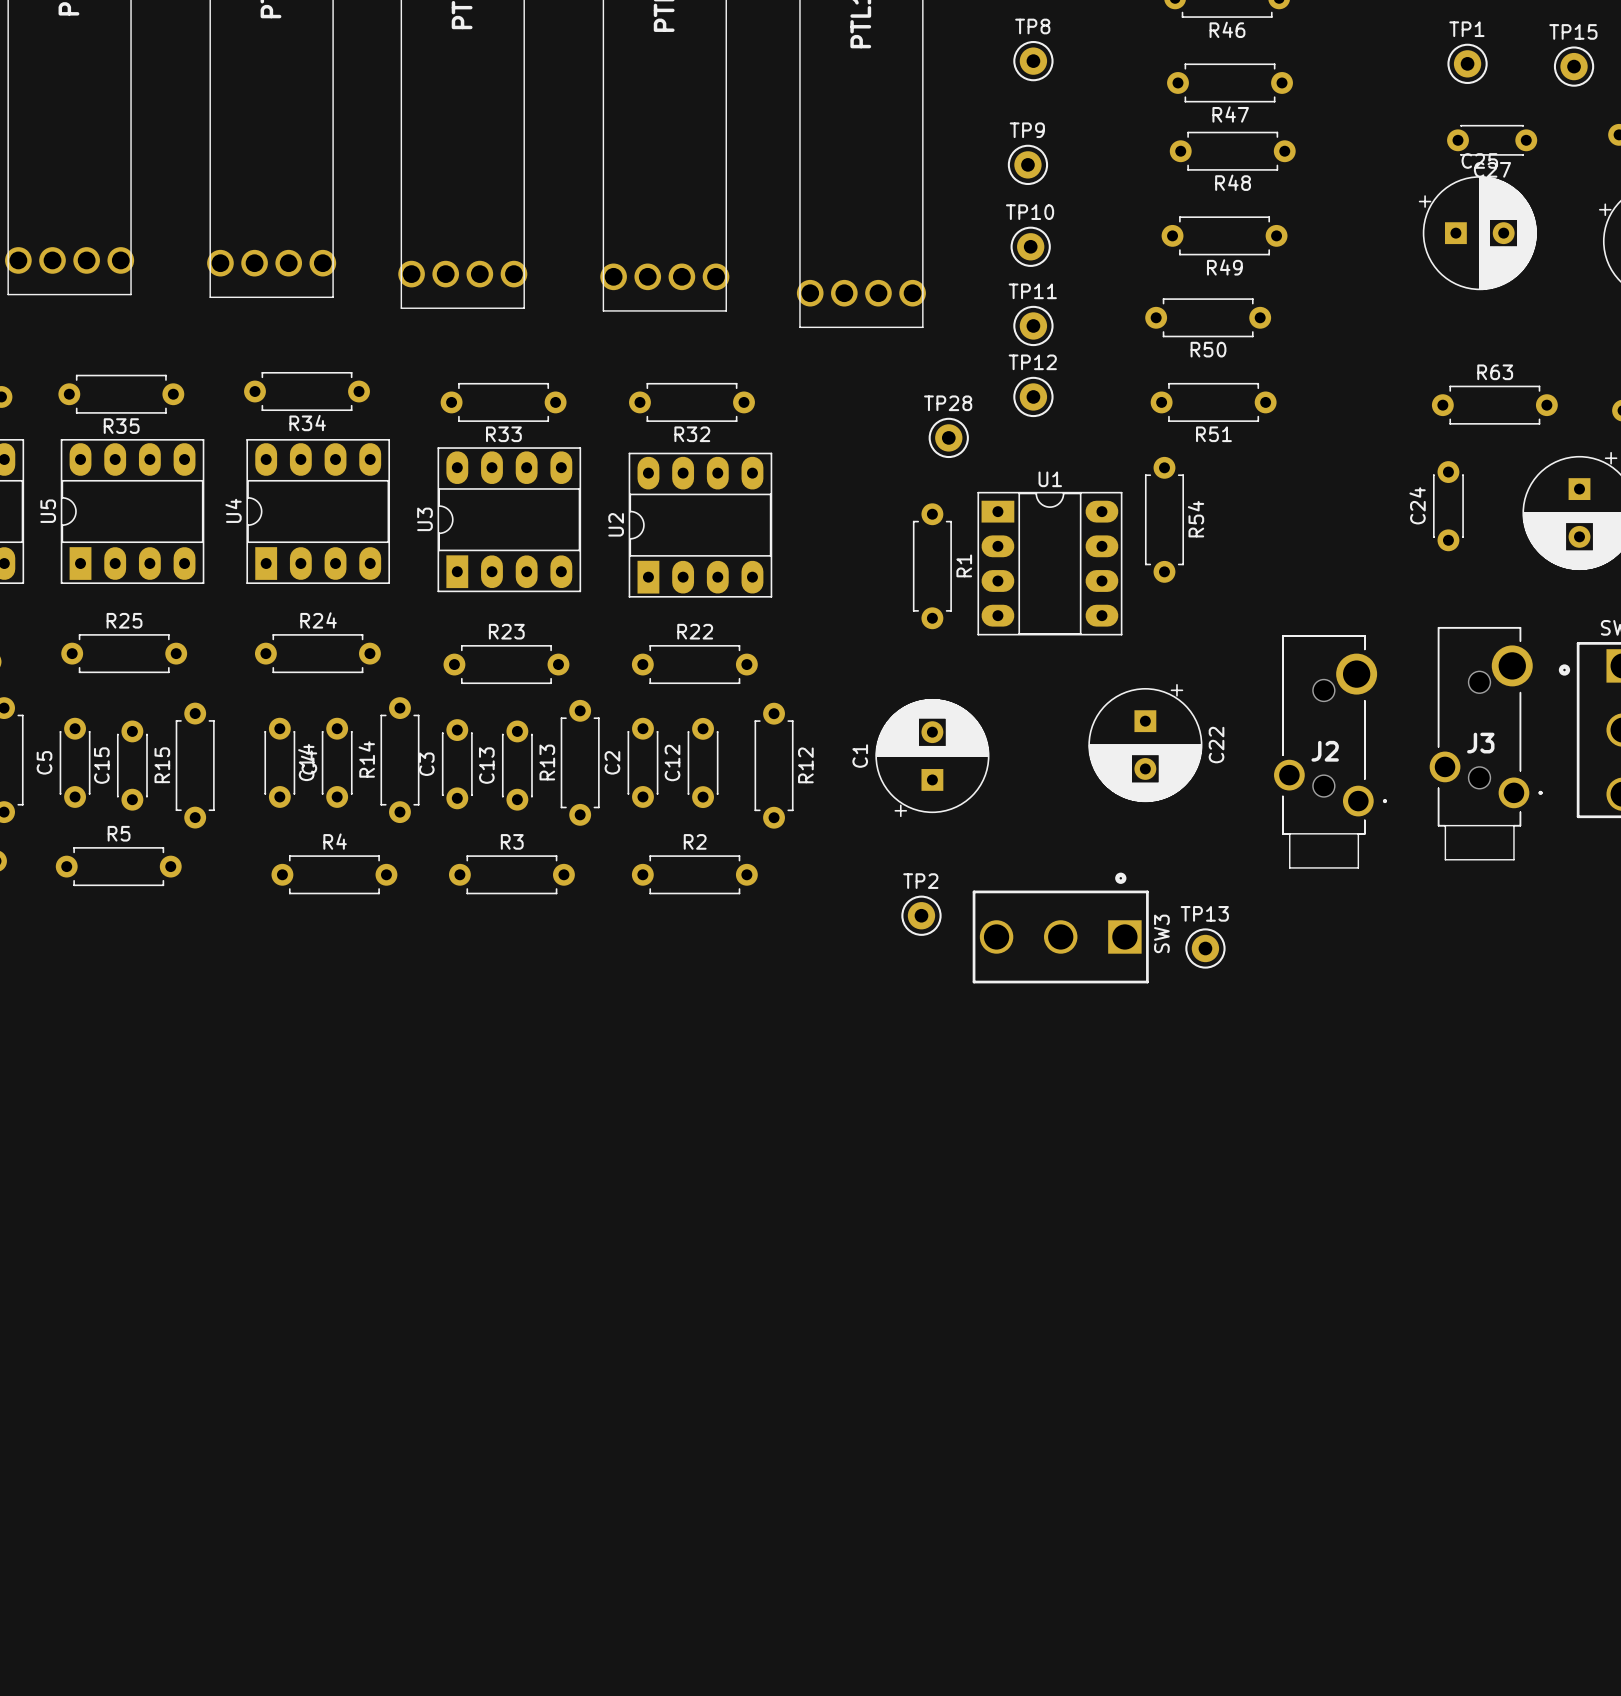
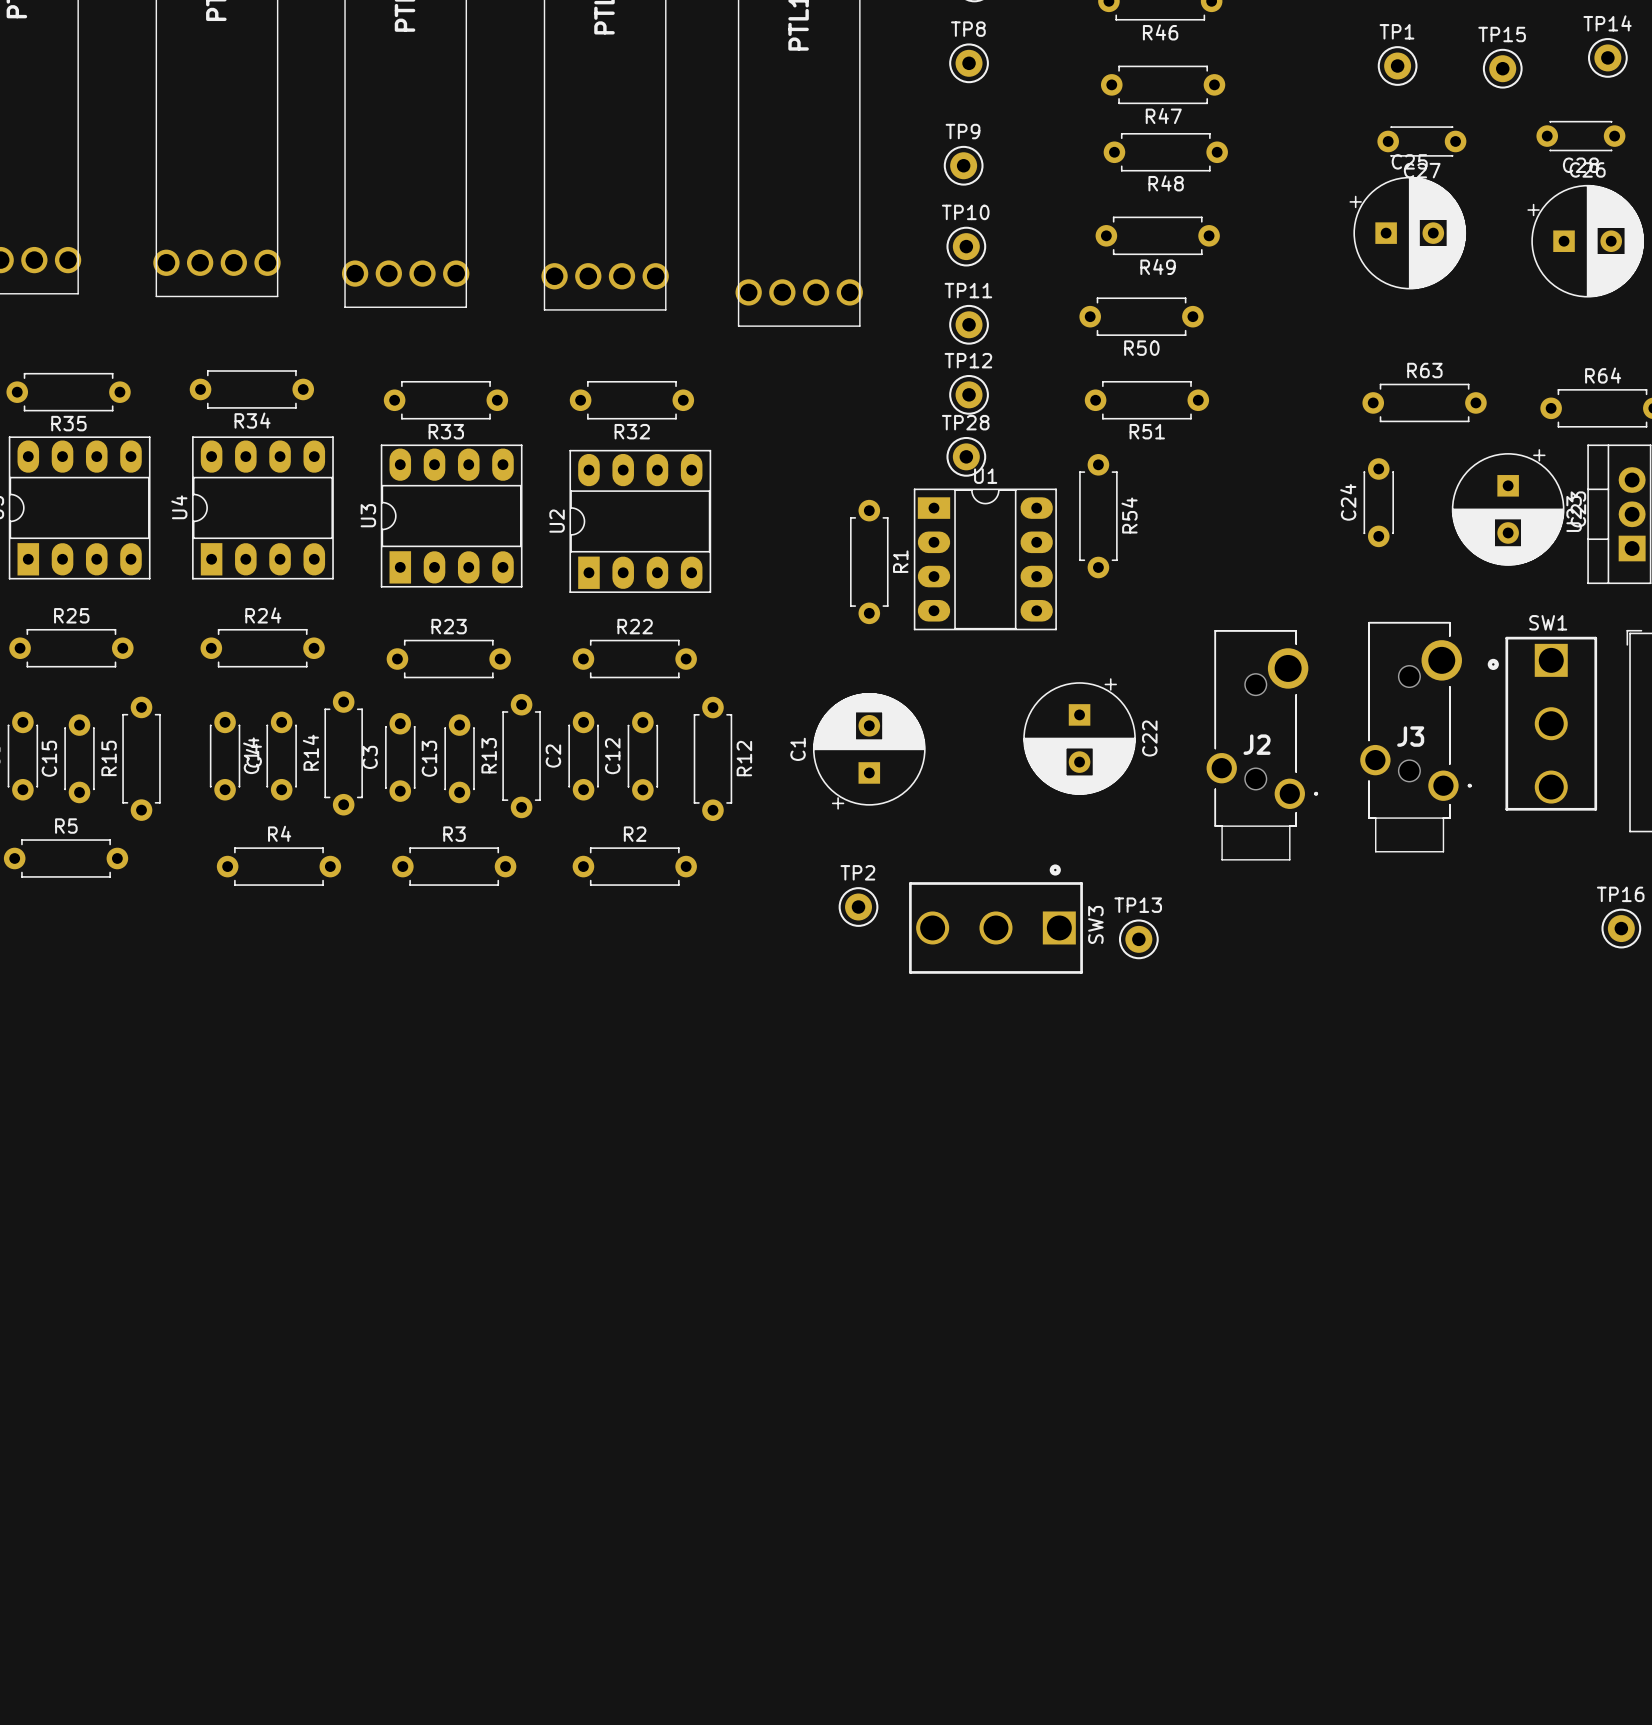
TP28 position: (948, 437) -> (966, 456)

